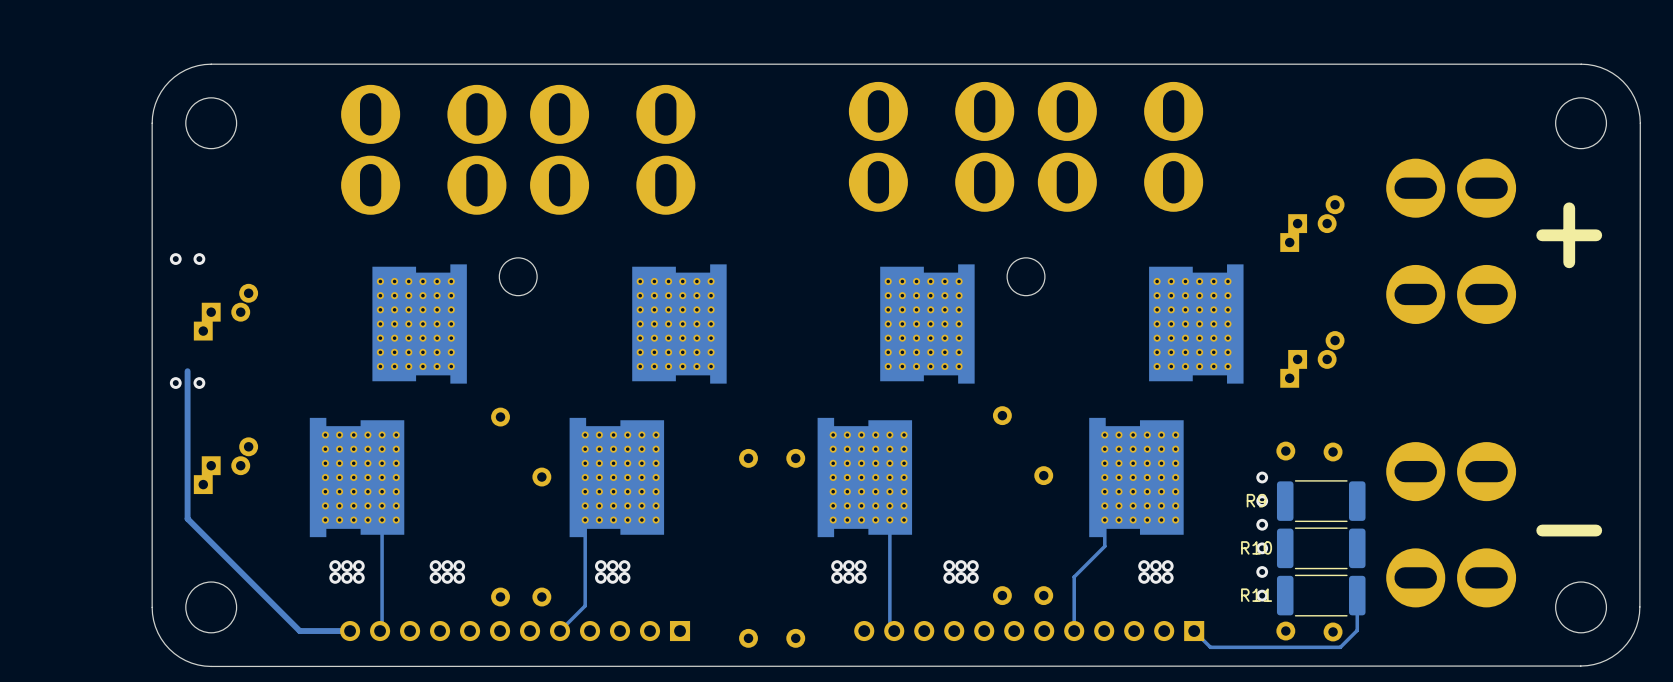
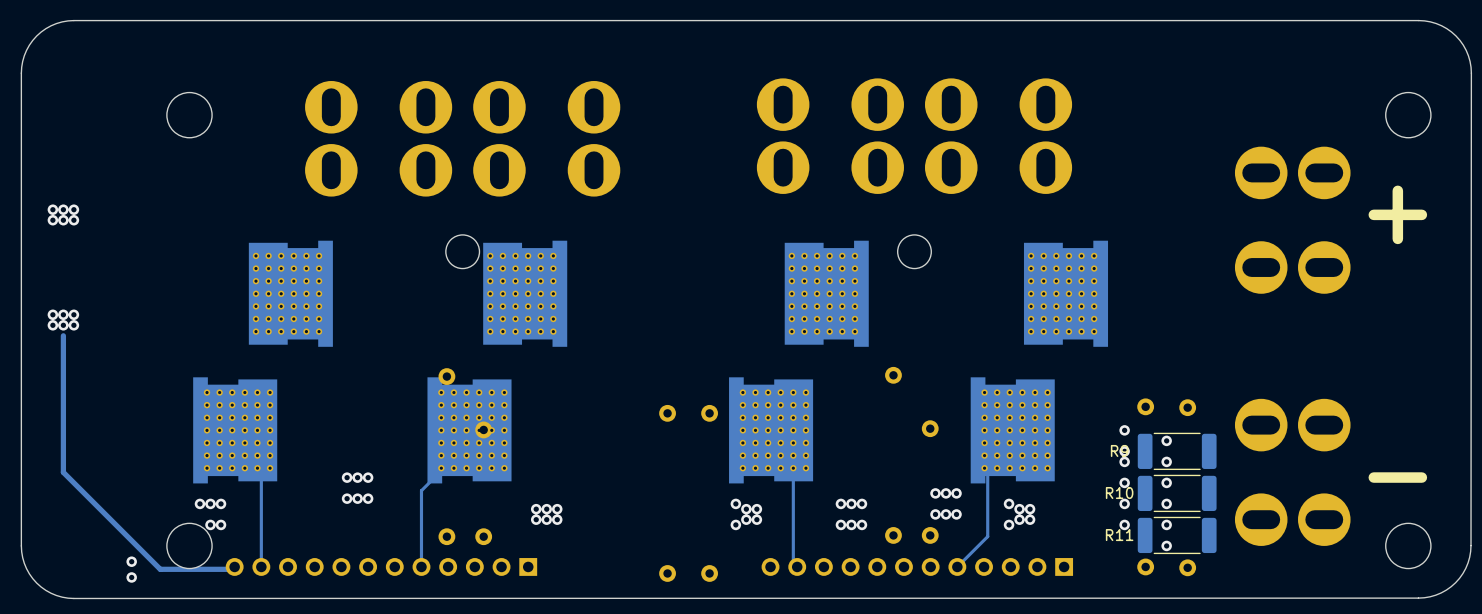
part: (1312, 223) -> none
via: none -> (52, 209)
via: none -> (63, 209)
via: none -> (73, 209)
via: none -> (52, 220)
via: none -> (63, 220)
via: none -> (73, 220)
via: (175, 259) -> none
via: (199, 259) -> none
part: (225, 312) -> none
part: none -> (290, 293)
part: (419, 323) -> none
part: none -> (525, 293)
part: (679, 323) -> none
via: none -> (52, 314)
via: none -> (63, 314)
via: none -> (73, 314)
via: none -> (52, 325)
via: none -> (63, 325)
via: none -> (73, 325)
part: (1312, 359) -> none
track: none -> (63, 335) (63, 472) (160, 569) (234, 569)
track: (187, 371) (187, 518) (299, 631) (350, 631) -> none
via: (175, 383) -> none
via: (199, 383) -> none
part: (225, 465) -> none
part: none -> (235, 430)
part: (357, 477) -> none
part: none -> (469, 430)
part: (616, 477) -> none
via: none -> (1166, 440)
via: none -> (1124, 461)
via: none -> (1166, 461)
track: (382, 520) (382, 629) (380, 631) -> none
track: (585, 520) (585, 605) (560, 631) -> none
track: (1104, 520) (1104, 546) (1074, 576) (1074, 631) -> (987, 468) (987, 536) (957, 566)
track: none -> (257, 470) (261, 474) (261, 569)
track: none -> (441, 470) (421, 490) (421, 569)
via: (1262, 524) -> none
via: none -> (347, 477)
via: none -> (357, 477)
via: none -> (368, 477)
via: none -> (1124, 482)
via: none -> (1166, 482)
via: none -> (935, 493)
via: none -> (946, 493)
via: none -> (956, 493)
via: (1262, 548) -> none
via: none -> (347, 498)
via: none -> (357, 498)
via: none -> (368, 498)
via: none -> (199, 503)
via: none -> (210, 503)
via: none -> (221, 503)
via: none -> (735, 503)
via: none -> (840, 503)
via: none -> (851, 503)
via: none -> (861, 503)
via: none -> (1009, 503)
via: none -> (1124, 503)
via: none -> (1166, 503)
via: (335, 566) -> none
via: (347, 566) -> none
via: (358, 566) -> none
via: (435, 566) -> none
via: (447, 566) -> none
via: (459, 566) -> none
via: (860, 566) -> none
via: (949, 566) -> none
via: (961, 566) -> none
via: (972, 566) -> none
via: (1167, 566) -> none
via: none -> (935, 514)
via: none -> (946, 514)
via: none -> (956, 514)
via: (1262, 571) -> none
via: (335, 577) -> none
via: (347, 577) -> none
via: (358, 577) -> none
via: (435, 577) -> none
via: (447, 577) -> none
via: (459, 577) -> none
via: (860, 577) -> none
via: (949, 577) -> none
via: (961, 577) -> none
via: (972, 577) -> none
via: (1167, 577) -> none
via: none -> (210, 524)
via: none -> (221, 524)
via: none -> (735, 524)
via: none -> (840, 524)
via: none -> (851, 524)
via: none -> (861, 524)
via: none -> (1009, 524)
via: none -> (1124, 524)
via: none -> (1166, 524)
via: (1262, 595) -> none
track: (1357, 595) (1357, 630) (1340, 647) (1210, 647) (1194, 631) -> none
via: none -> (1166, 545)
via: none -> (131, 561)
part position: (515, 631) -> (381, 566)
via: none -> (131, 577)
board edge: (1580, 666) (1600, 662) (1622, 648) (1636, 626) (1639, 606) (1639, 116) (1636, 103) (1627, 86) (1606, 70) (1581, 64) (211, 64) (191, 67) (169, 81) (155, 103) (152, 123) (152, 614) (158, 633) (169, 649) (185, 660) (211, 666) -> (1408, 598) (1430, 596) (1451, 586) (1462, 573) (1470, 551) (1471, 73) (1468, 55) (1463, 45) (1455, 35) (1441, 25) (1418, 20) (62, 21) (45, 28) (32, 40) (26, 50) (21, 67) (22, 557) (29, 573) (36, 583) (51, 593) (62, 597) (189, 598)

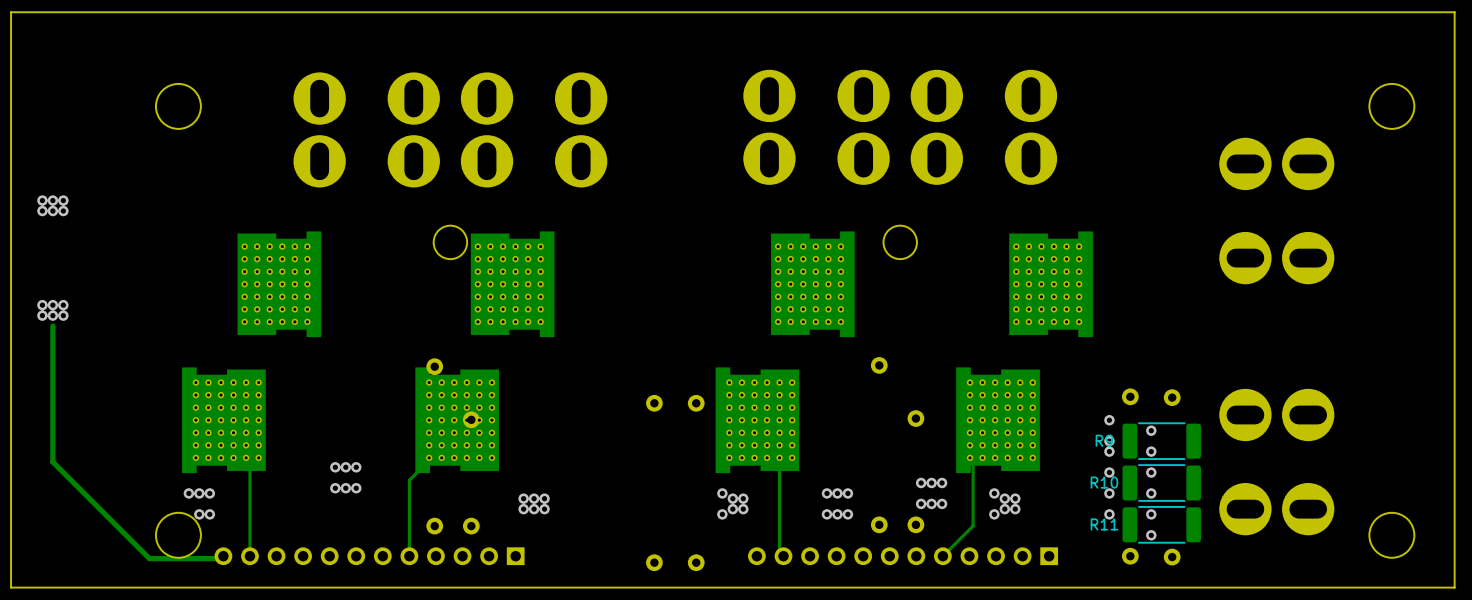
board edge: (73, 20) (56, 23) (36, 35) (24, 55) (21, 73) -> (63, 12) (11, 12) (11, 64)
board edge: (1418, 20) (1441, 25) (1455, 35) (1468, 55) (1471, 73) (1470, 551) (1468, 562) (1459, 578) (1451, 586) (1435, 595) (1418, 598) (73, 598) (56, 595) (36, 583) (24, 563) (21, 545) -> (1402, 12) (1454, 12) (1454, 587) (11, 587) (11, 535)
text: + (1397, 214) -> none
text: - (1397, 477) -> none
via: (131, 561) -> none
via: (131, 577) -> none

